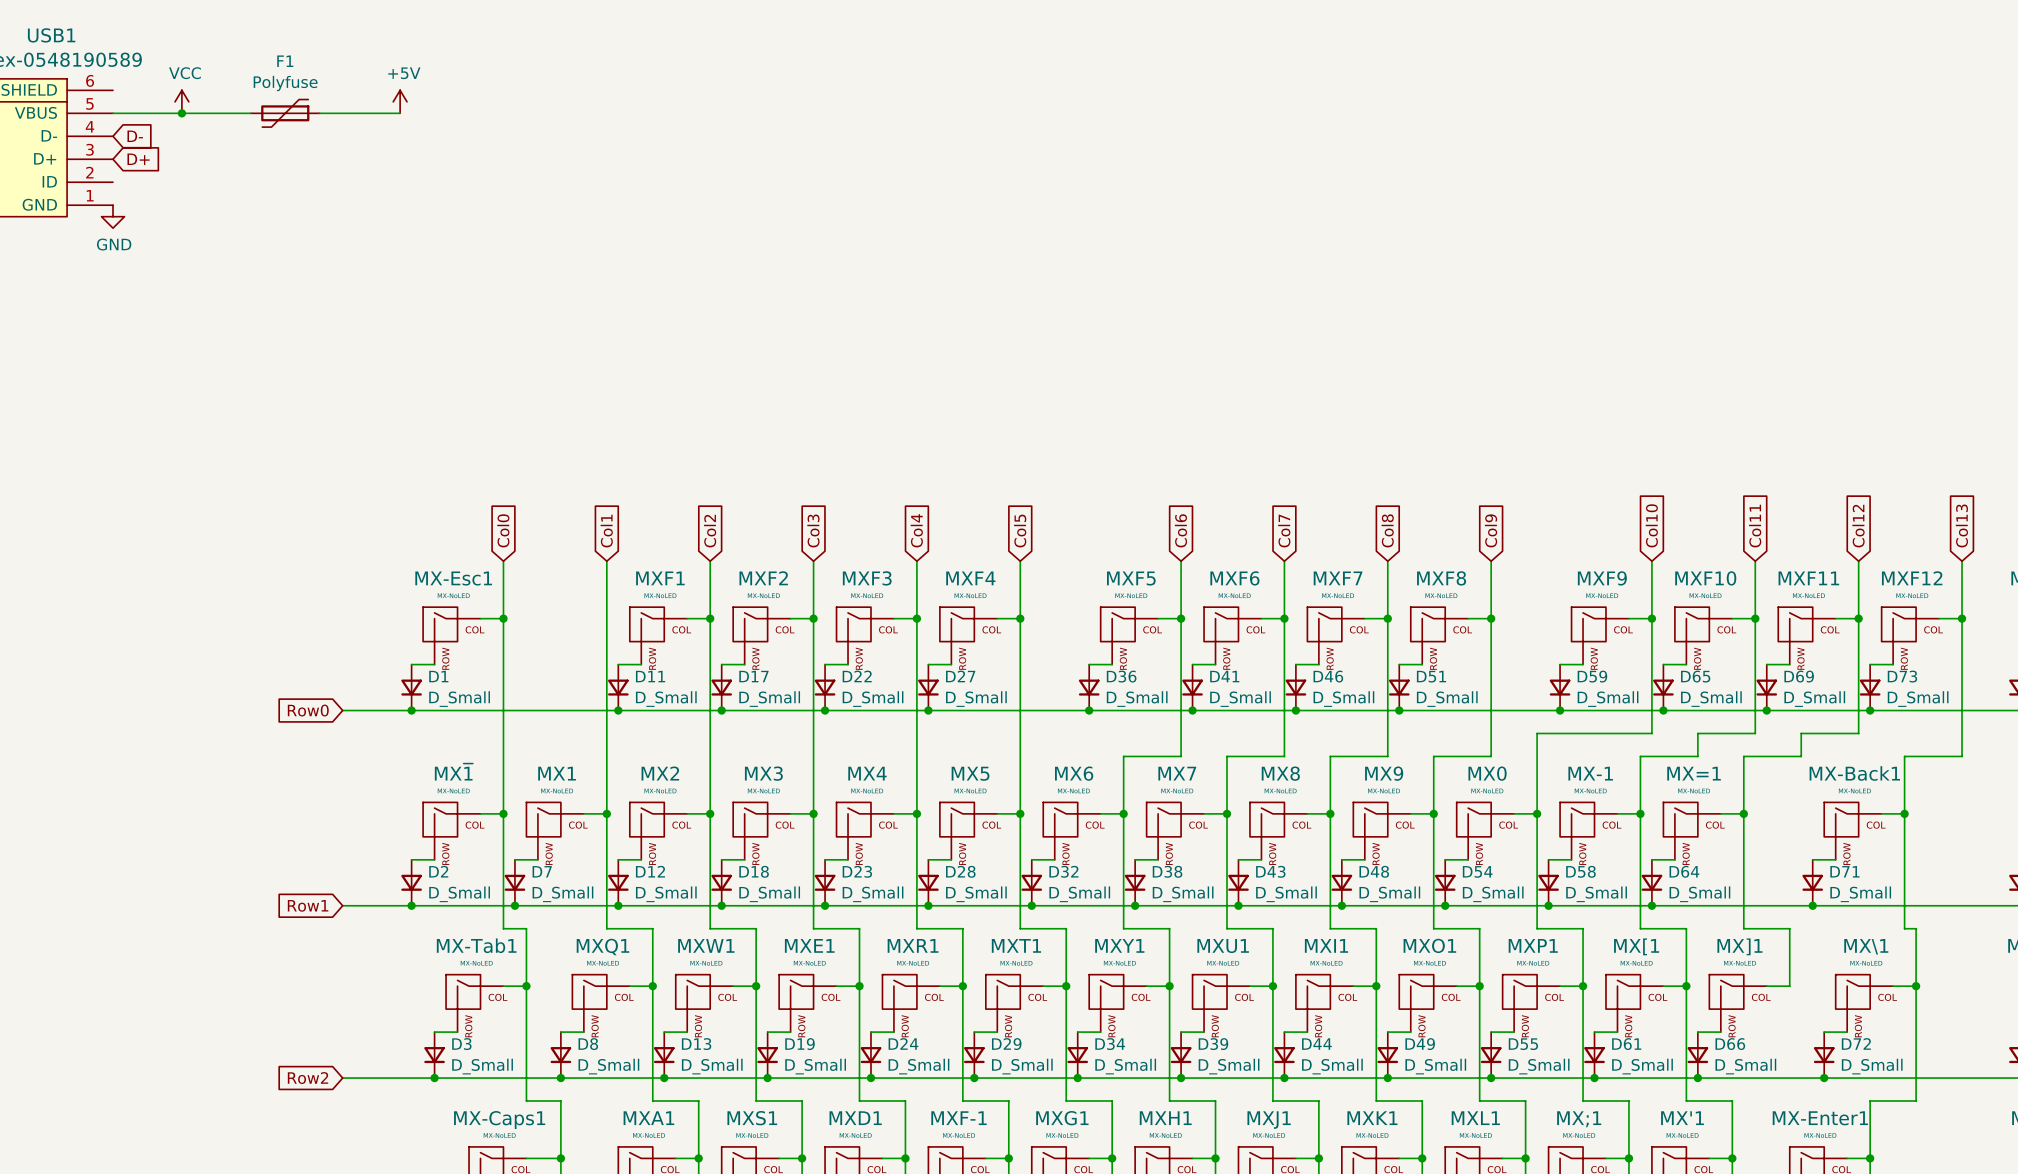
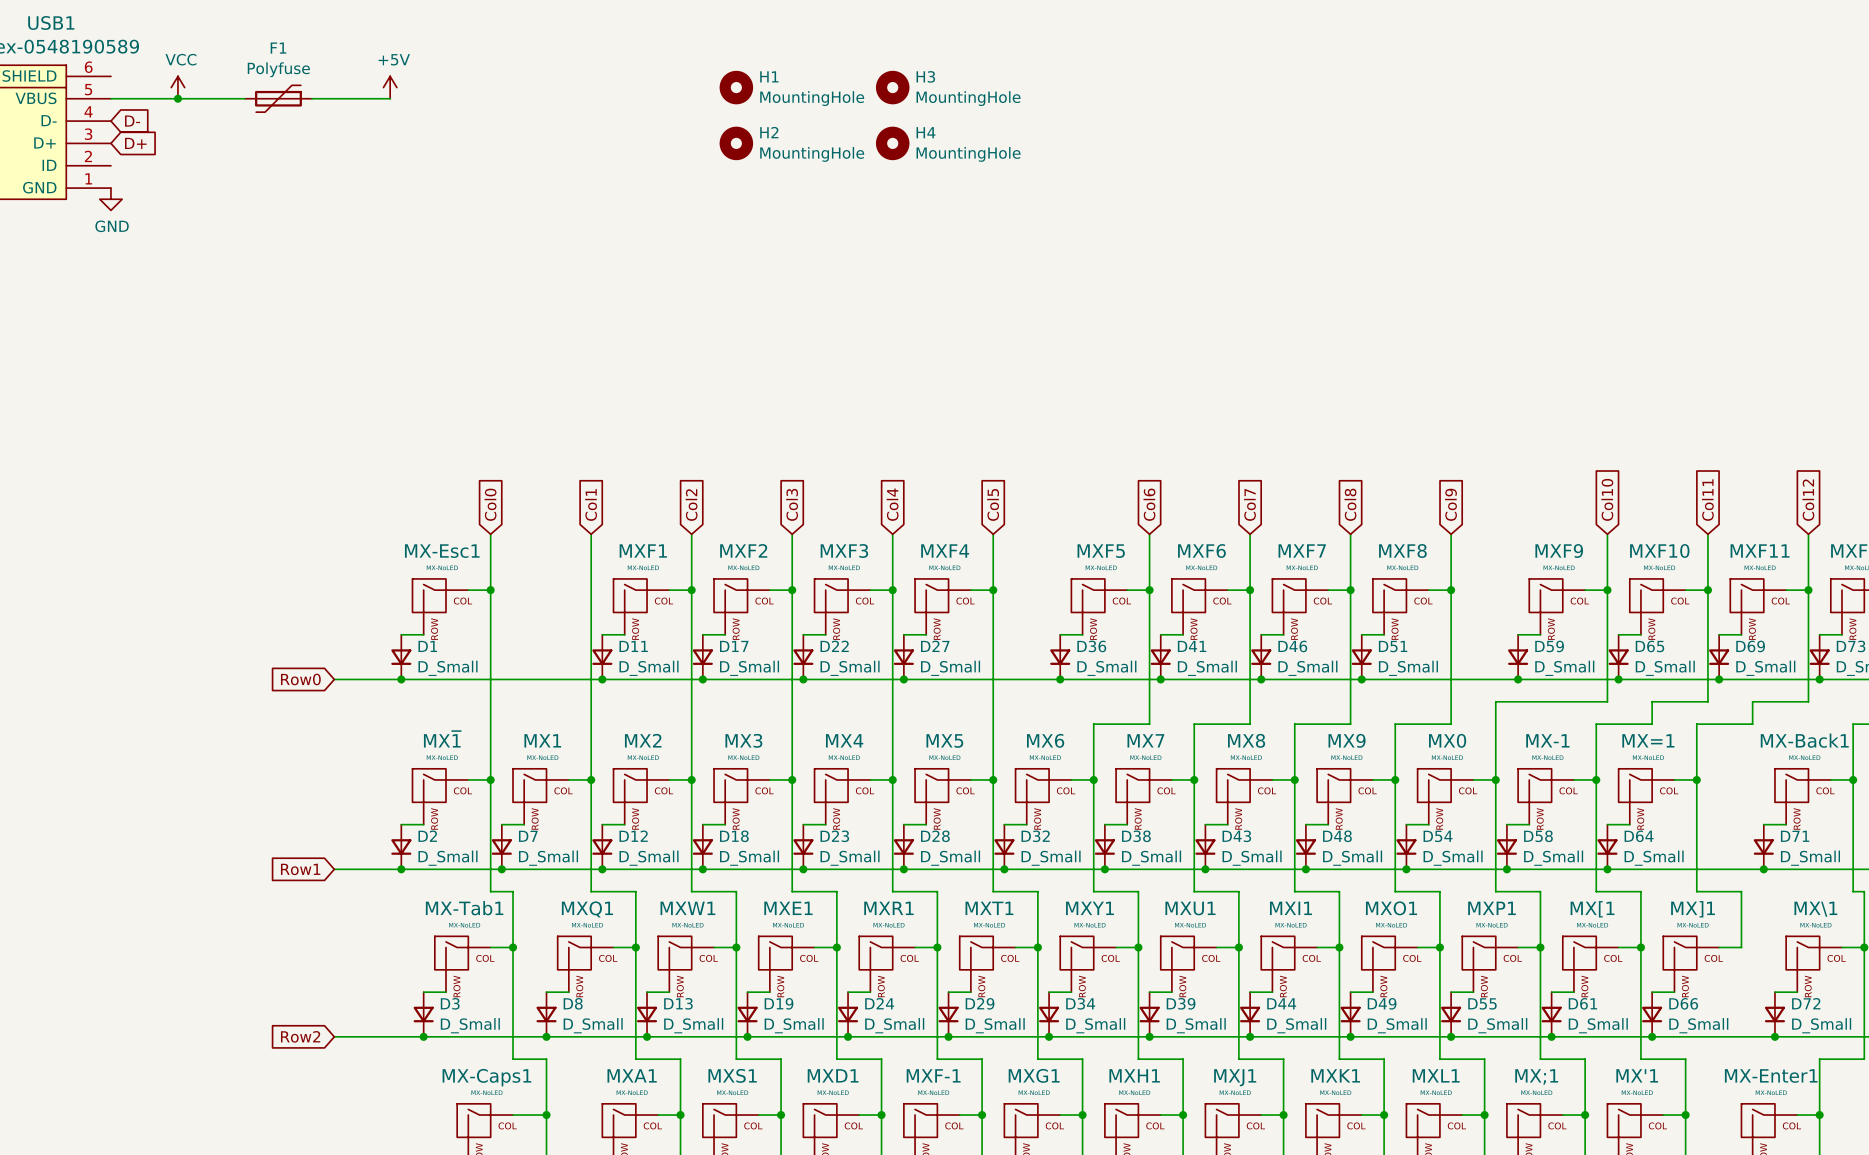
H1: none -> MountingHole (736, 87)
H3: none -> MountingHole (892, 87)
H2: none -> MountingHole (736, 143)
H4: none -> MountingHole (892, 143)

